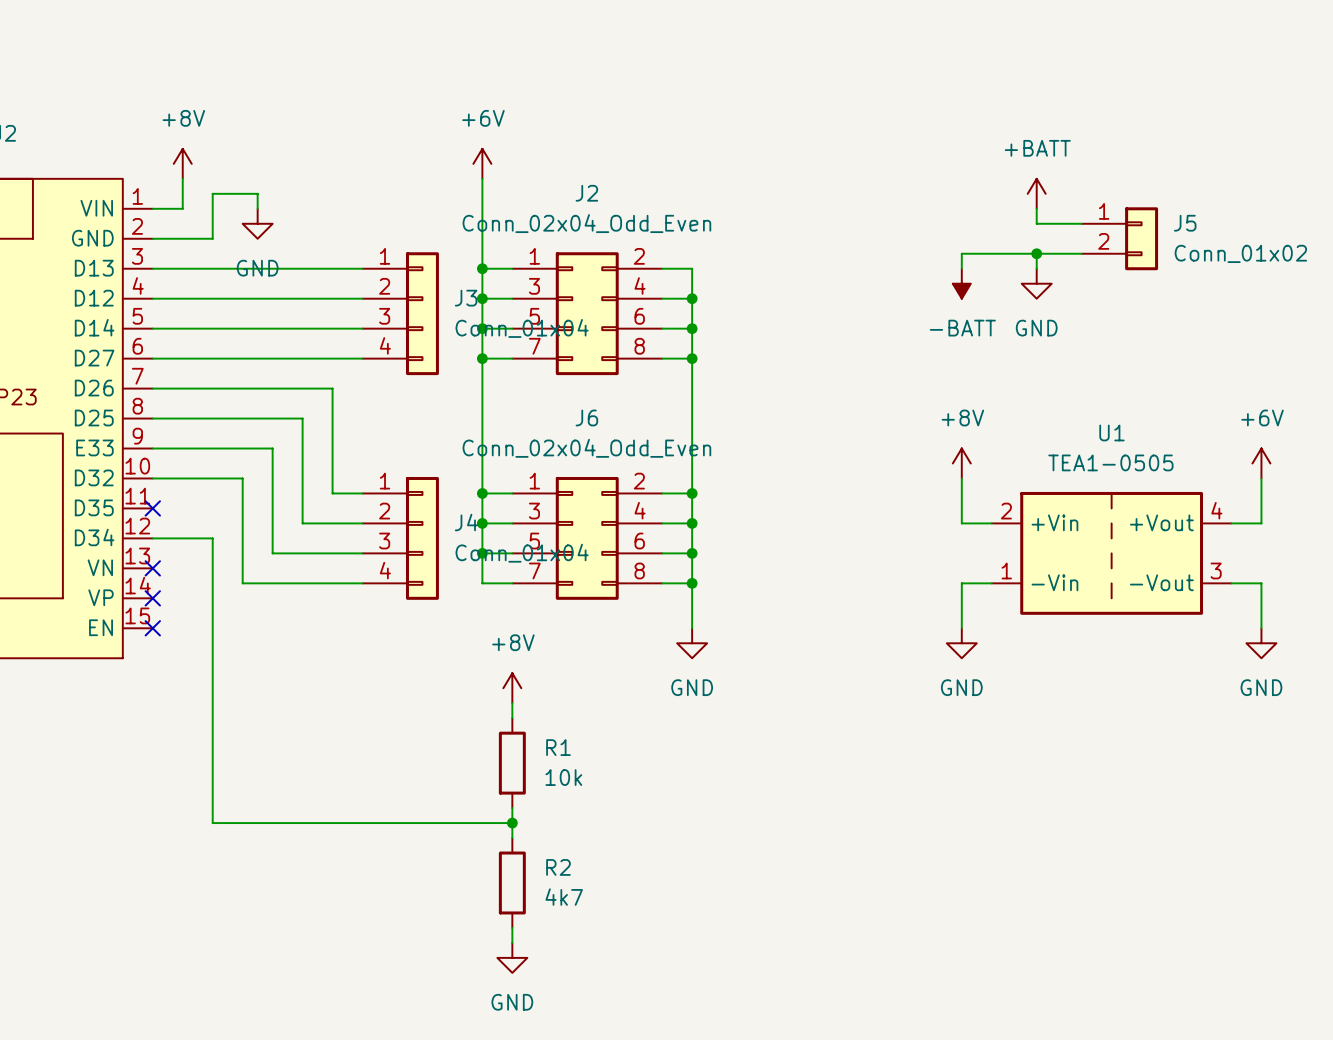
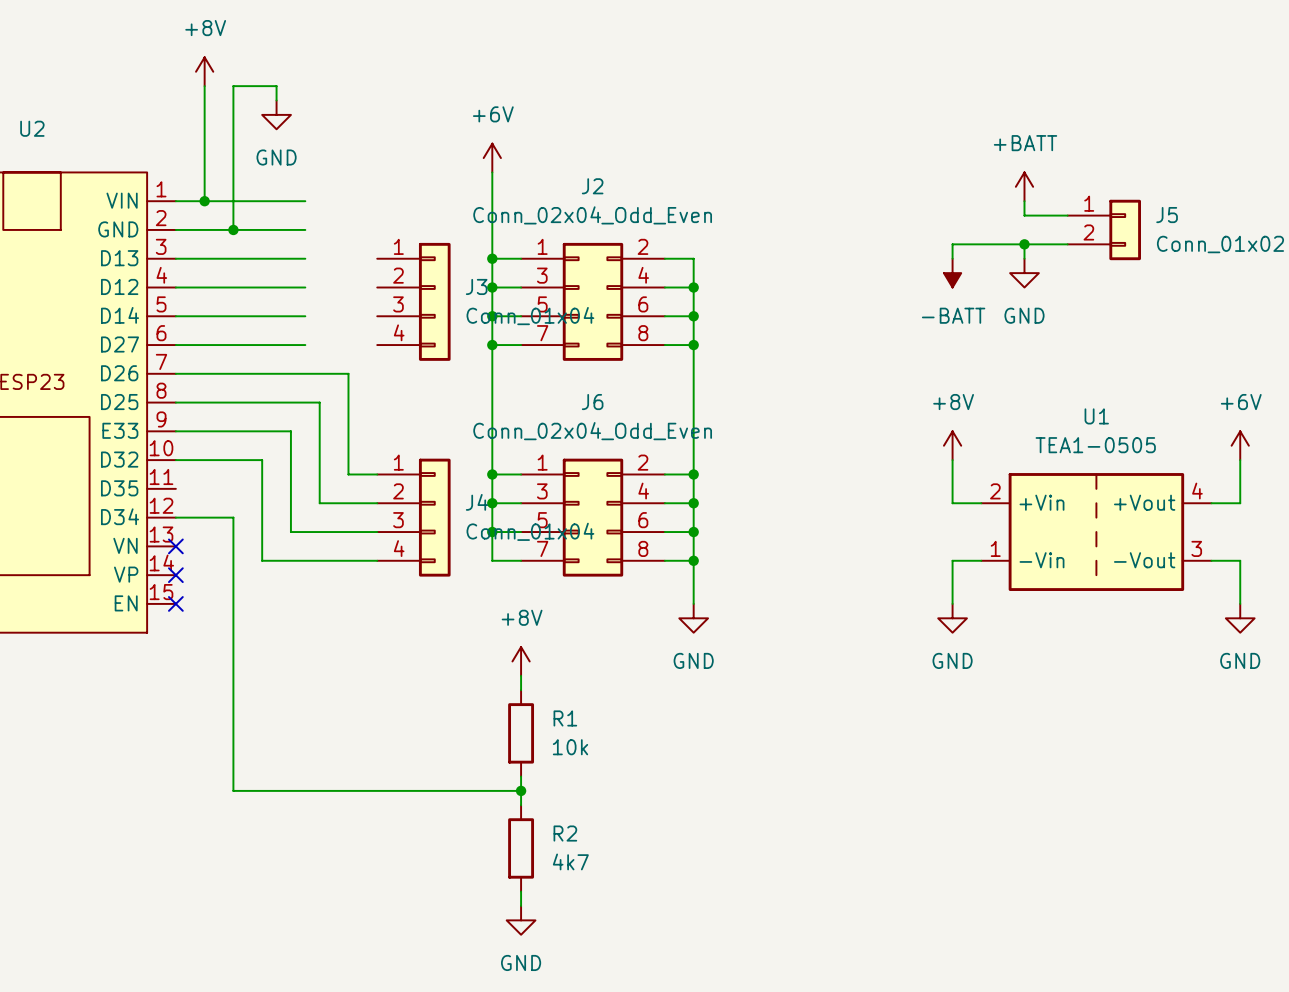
wire: none -> (204, 86) (204, 172)
power symbol position: +8V (182, 163) -> +8V (204, 71)
wire: (212, 193) (257, 193) (257, 208) -> (233, 186) (233, 86) (276, 86) (276, 100)
wire: none -> (204, 201) (305, 201)
junction: none -> (204, 201)
power symbol position: GND (257, 223) -> GND (276, 114)
junction: none -> (233, 229)
wire: (287, 268) (362, 268) -> (233, 229) (305, 229)
wire: (287, 298) (362, 298) -> none
wire: (287, 328) (362, 328) -> none
wire: (287, 358) (362, 358) -> none
no-connect mark: (152, 508) -> none

